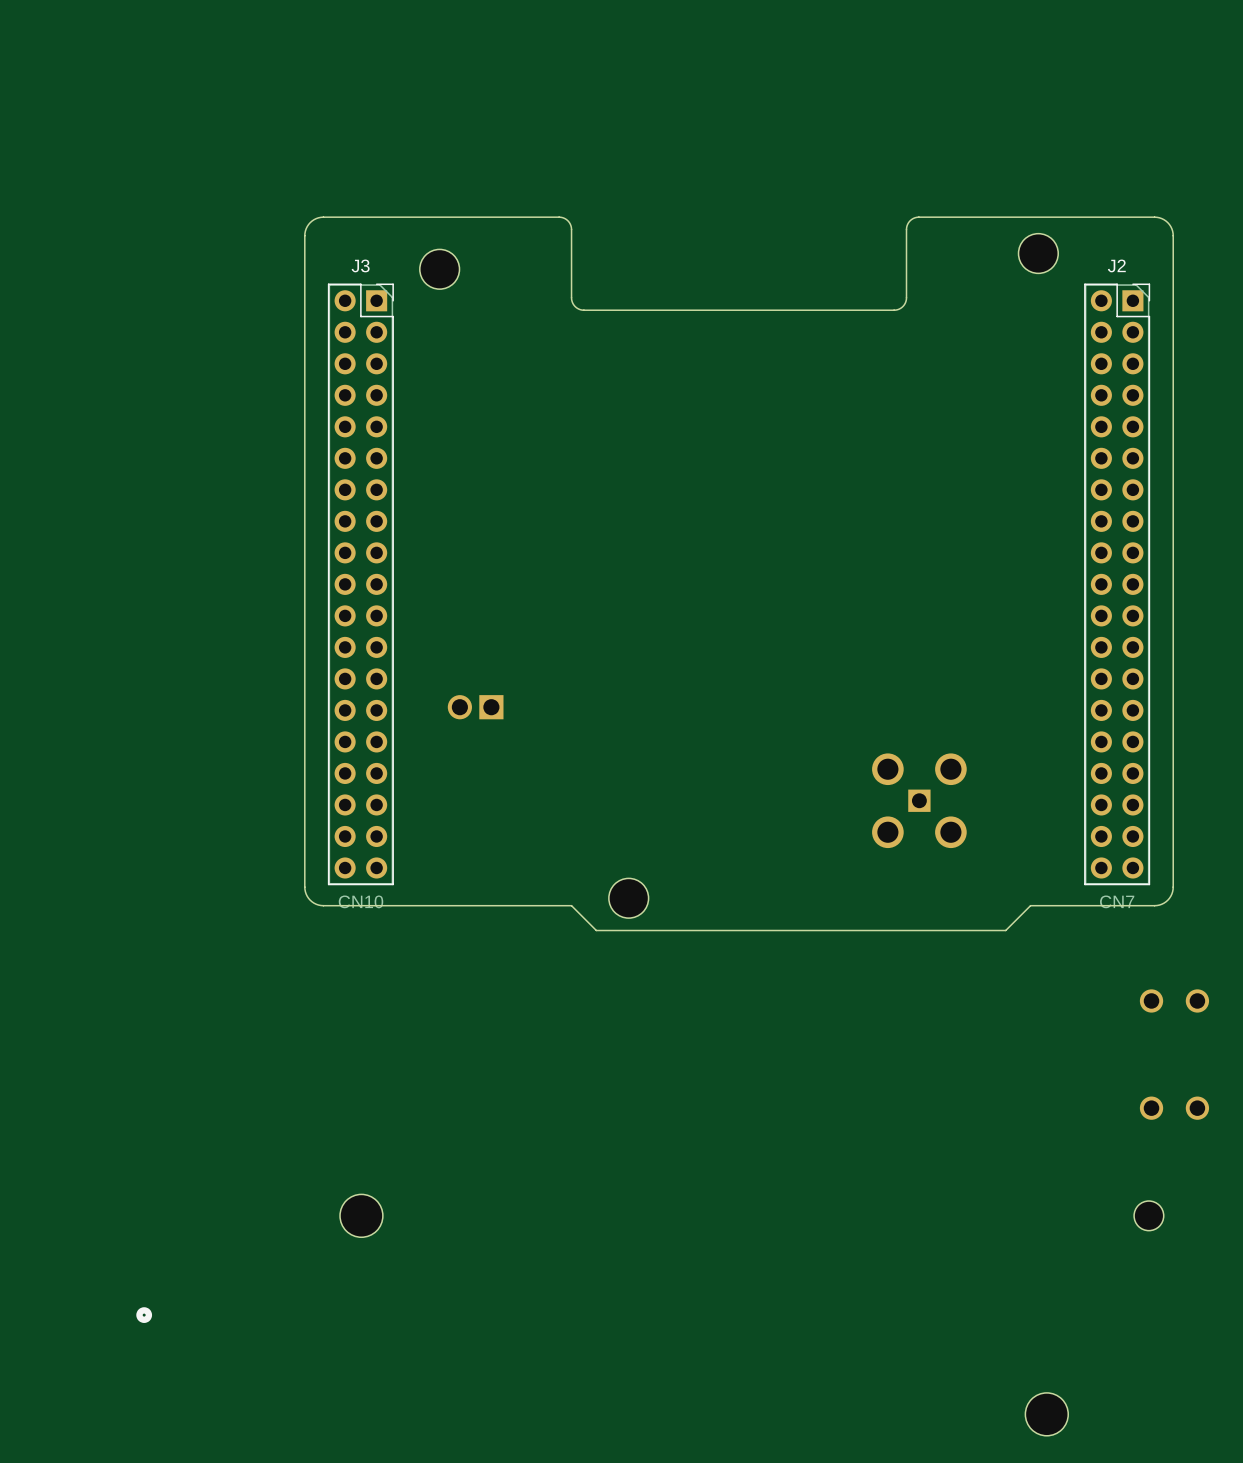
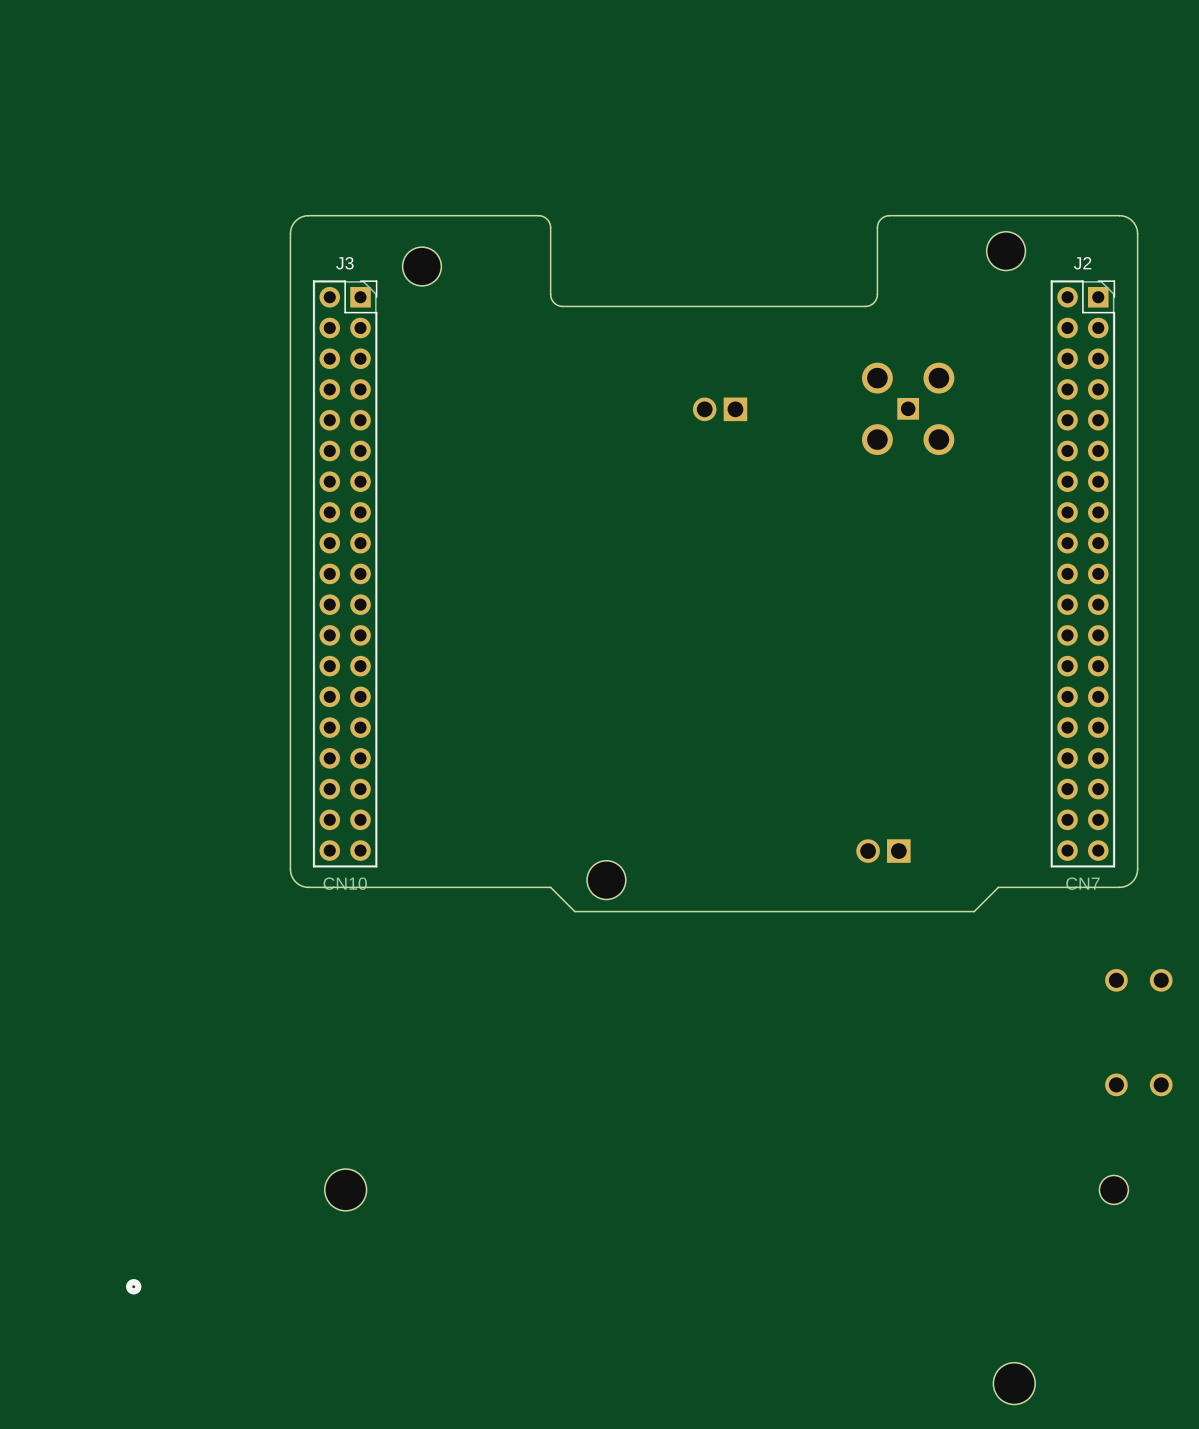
part: none -> (720, 409)
part: none -> (908, 408)
part: (475, 707) -> none
part: (919, 800) -> none
part: none -> (883, 851)

